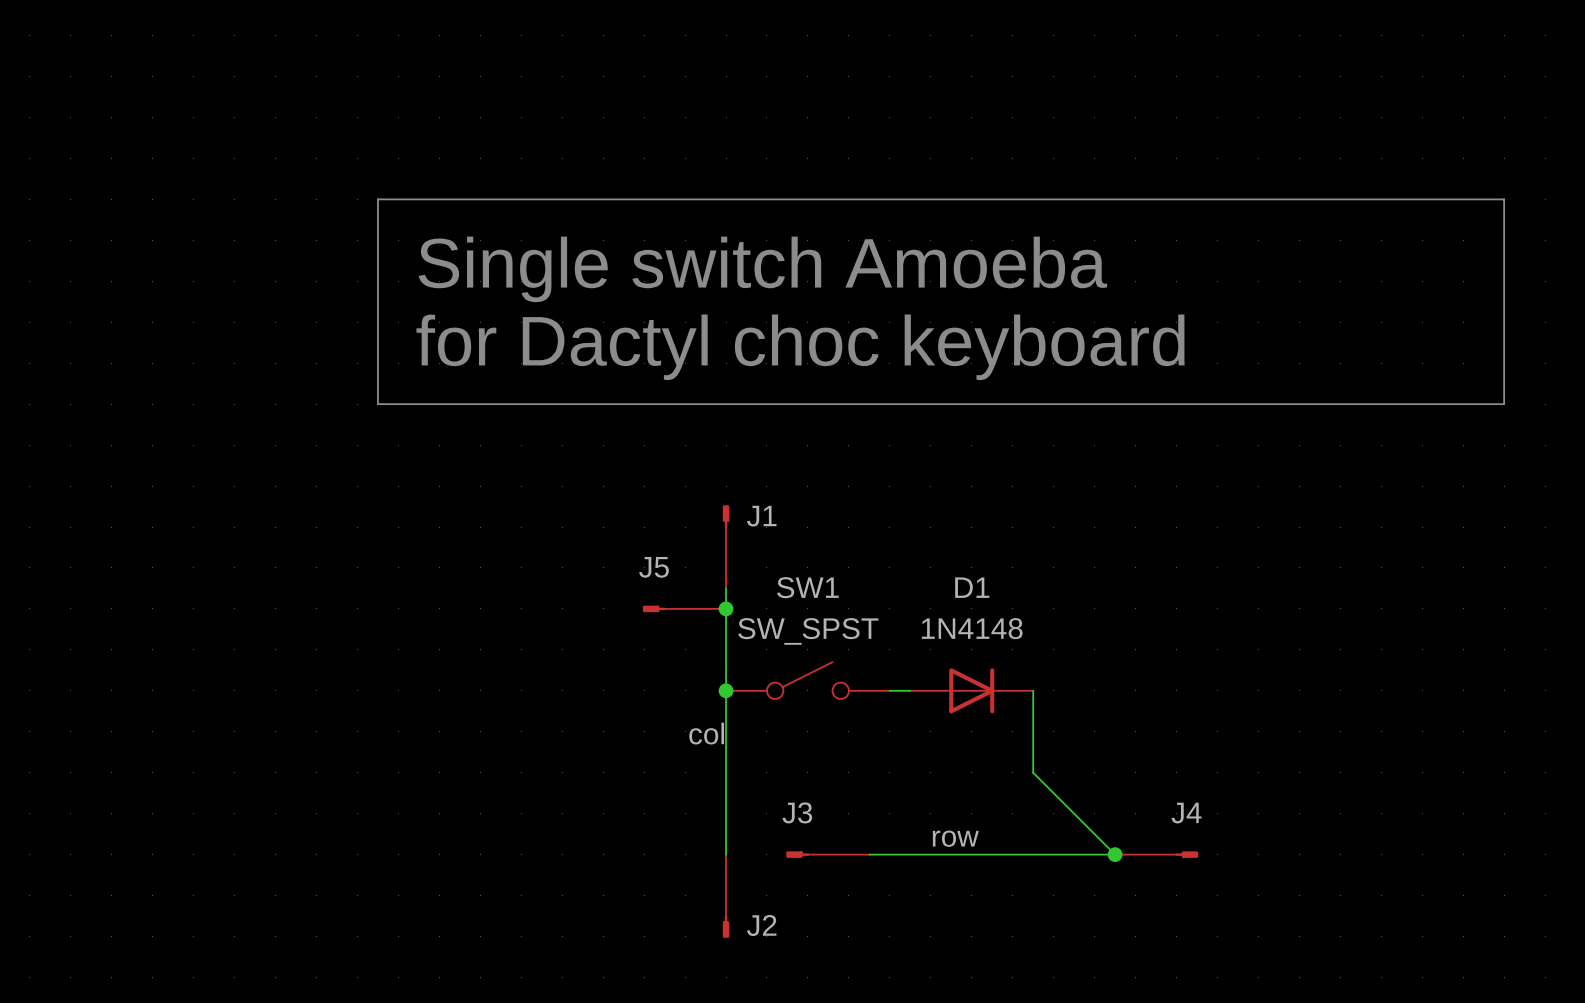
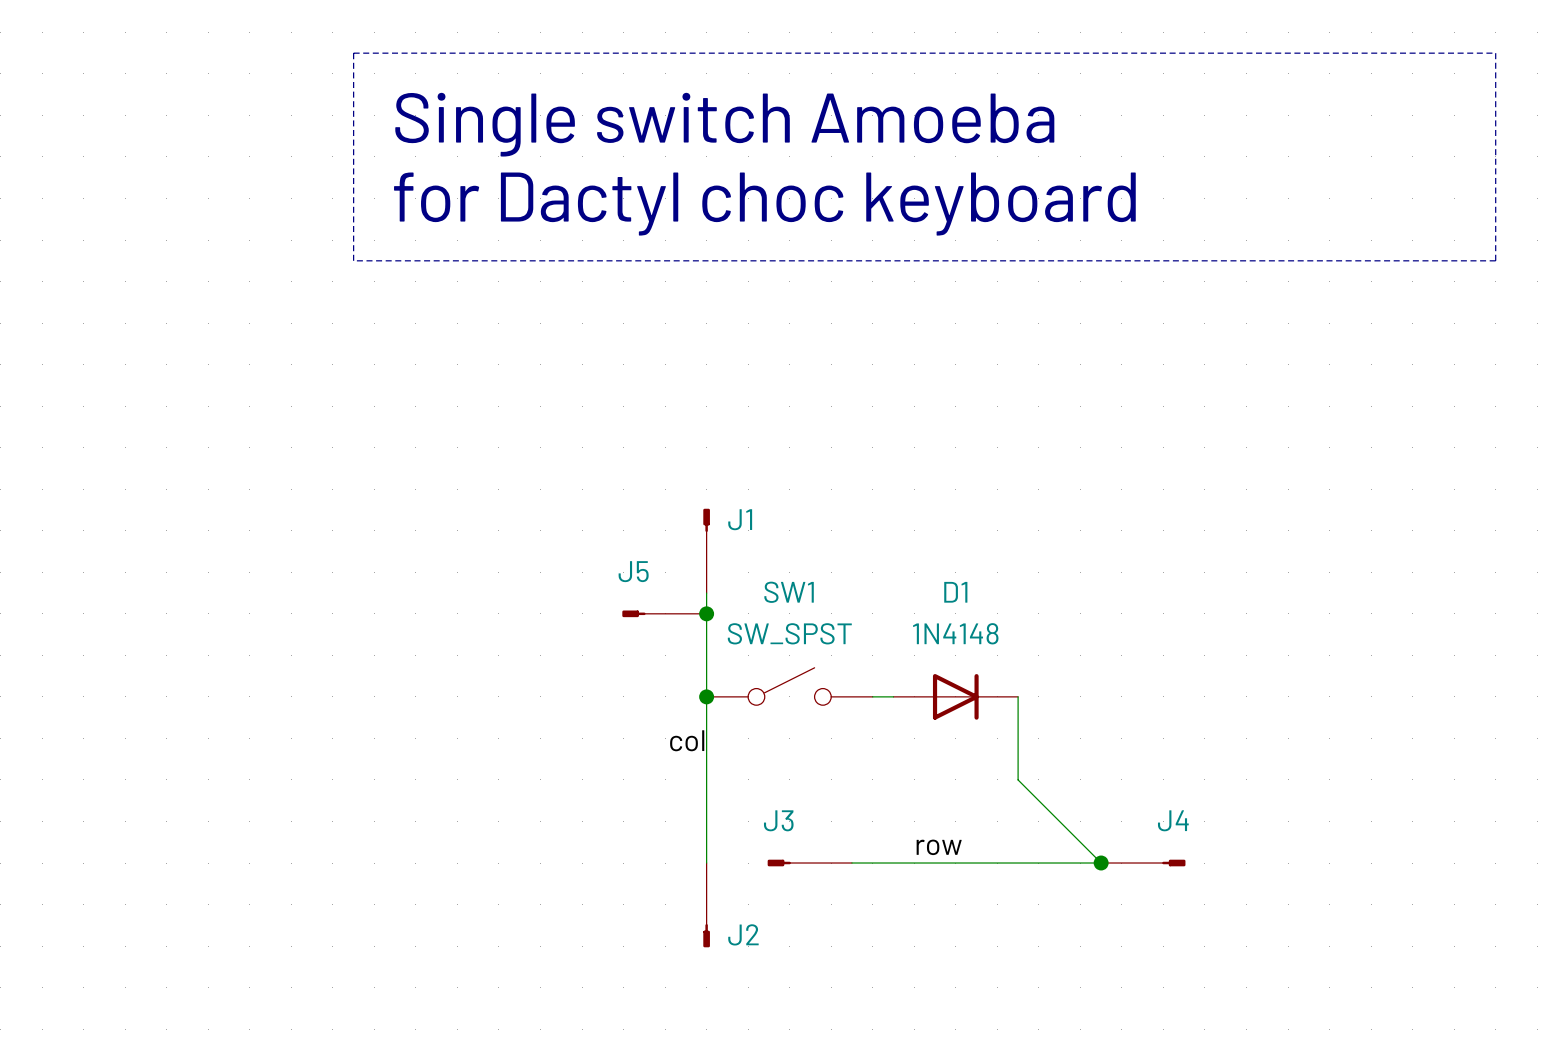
line: (377, 199) (1504, 199) (1504, 404) (377, 404) (377, 199) -> (353, 53) (1495, 53) (1495, 260) (353, 260) (353, 53)
text position: Single switch Amoeba (762, 269) -> Single switch Amoeba (724, 124)
text position: for Dactyl choc keyboard (800, 347) -> for Dactyl choc keyboard (764, 204)

